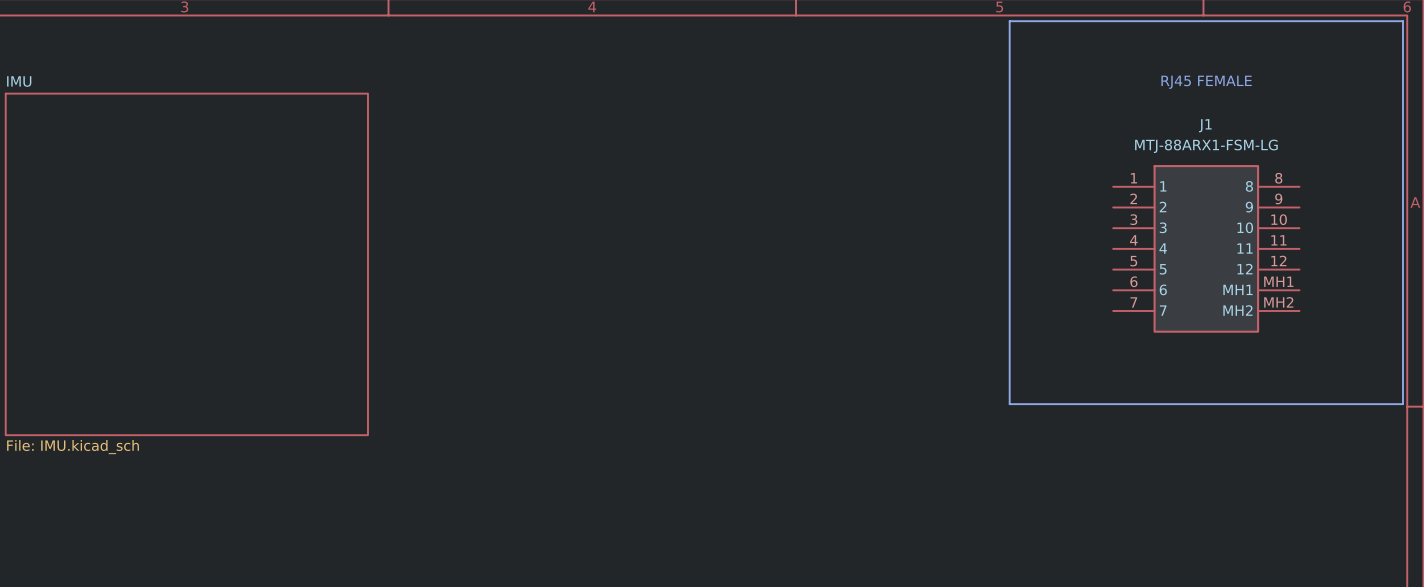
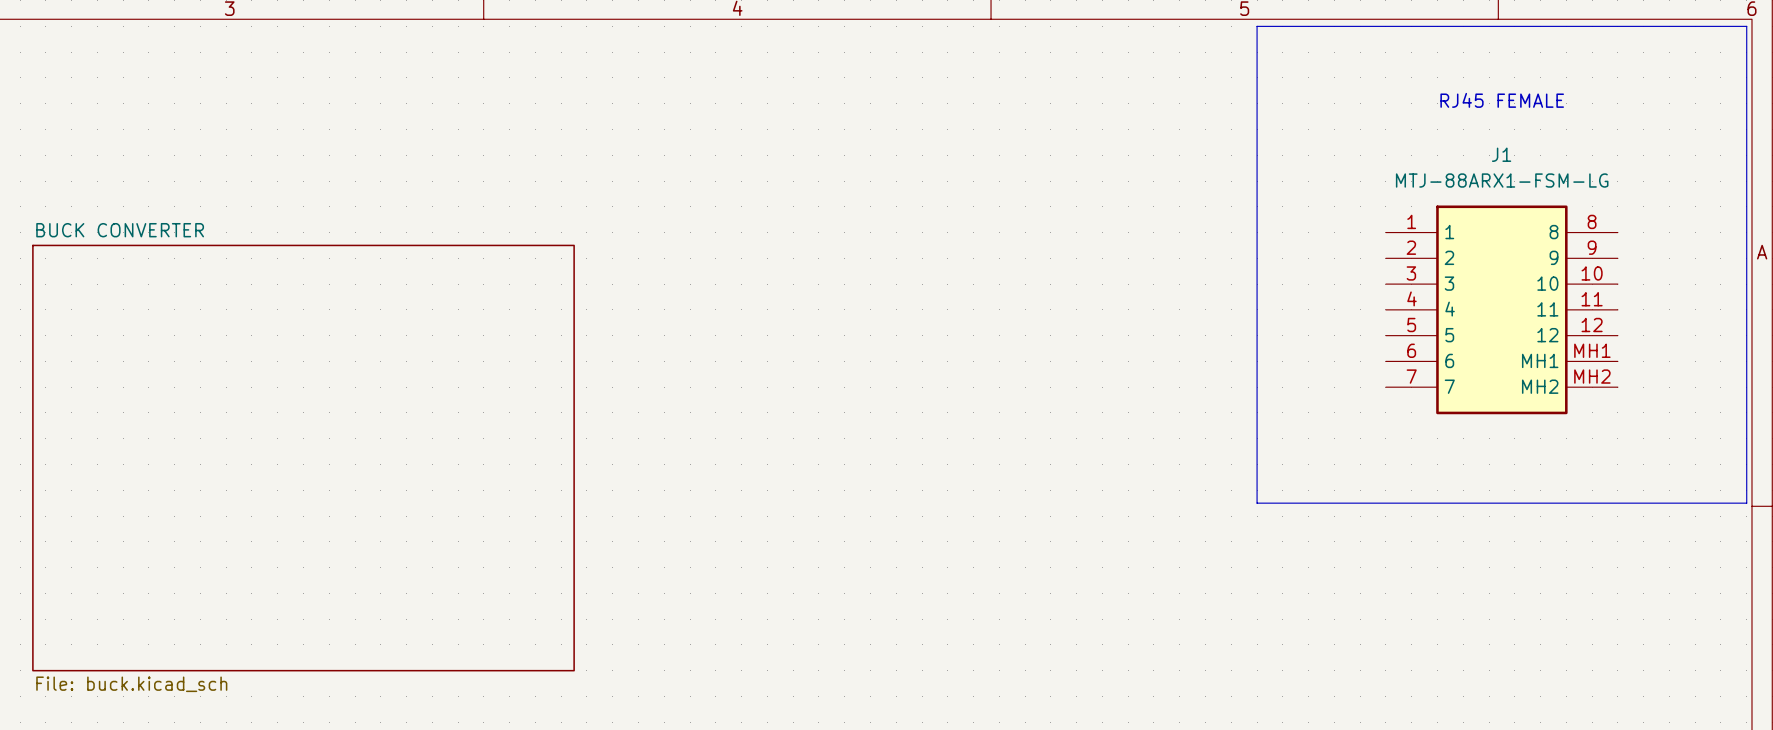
sheet IMU: File: IMU.kicad_sch (186, 264) -> none
sheet BUCK CONVERTER: none -> File: buck.kicad_sch (303, 458)

